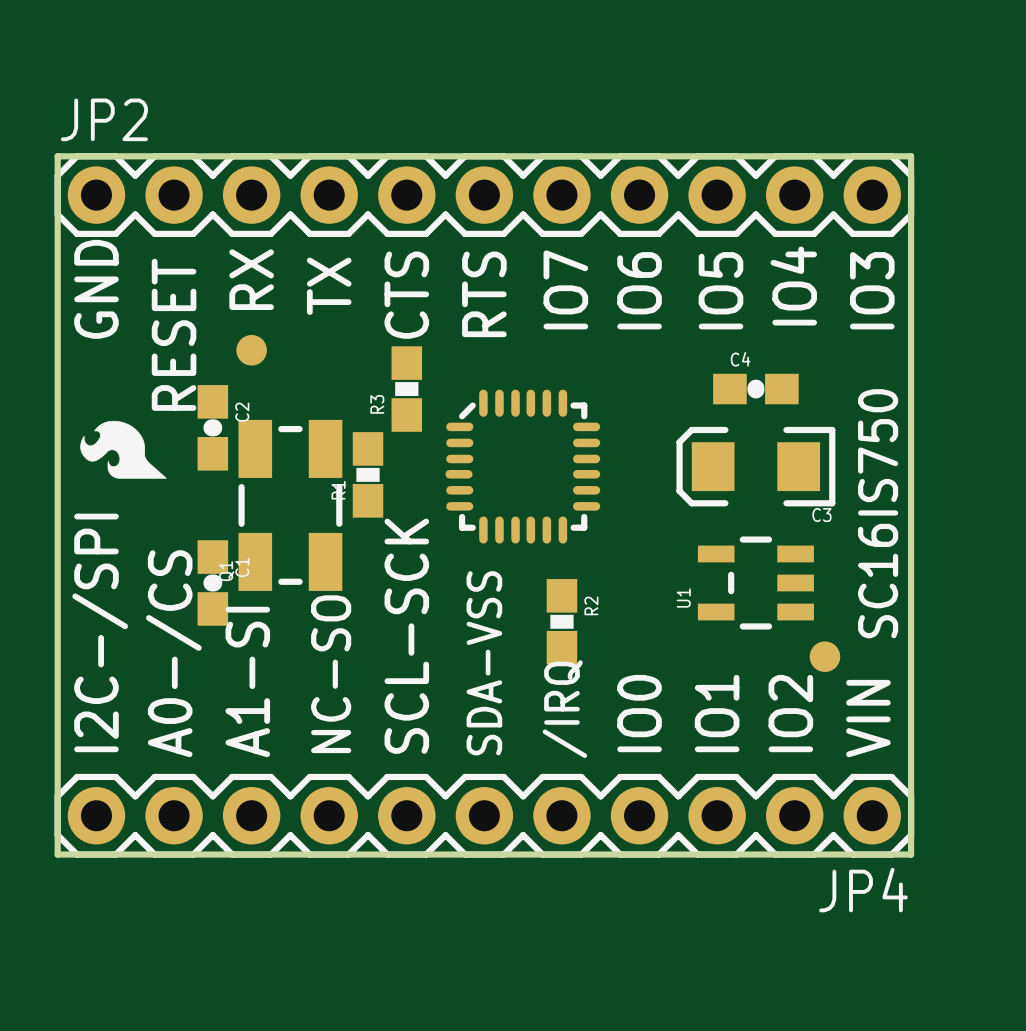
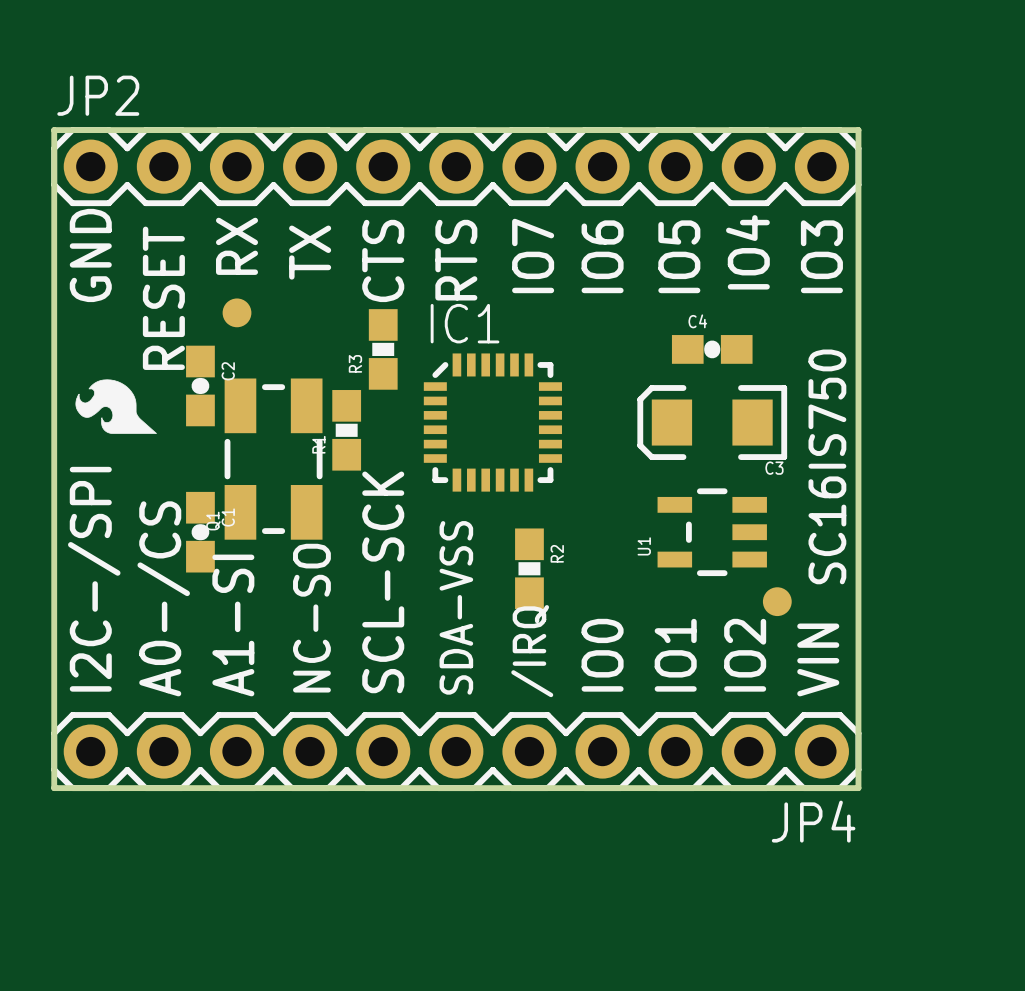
part: (522, 466) -> none
IC1: none -> (492, 422)

